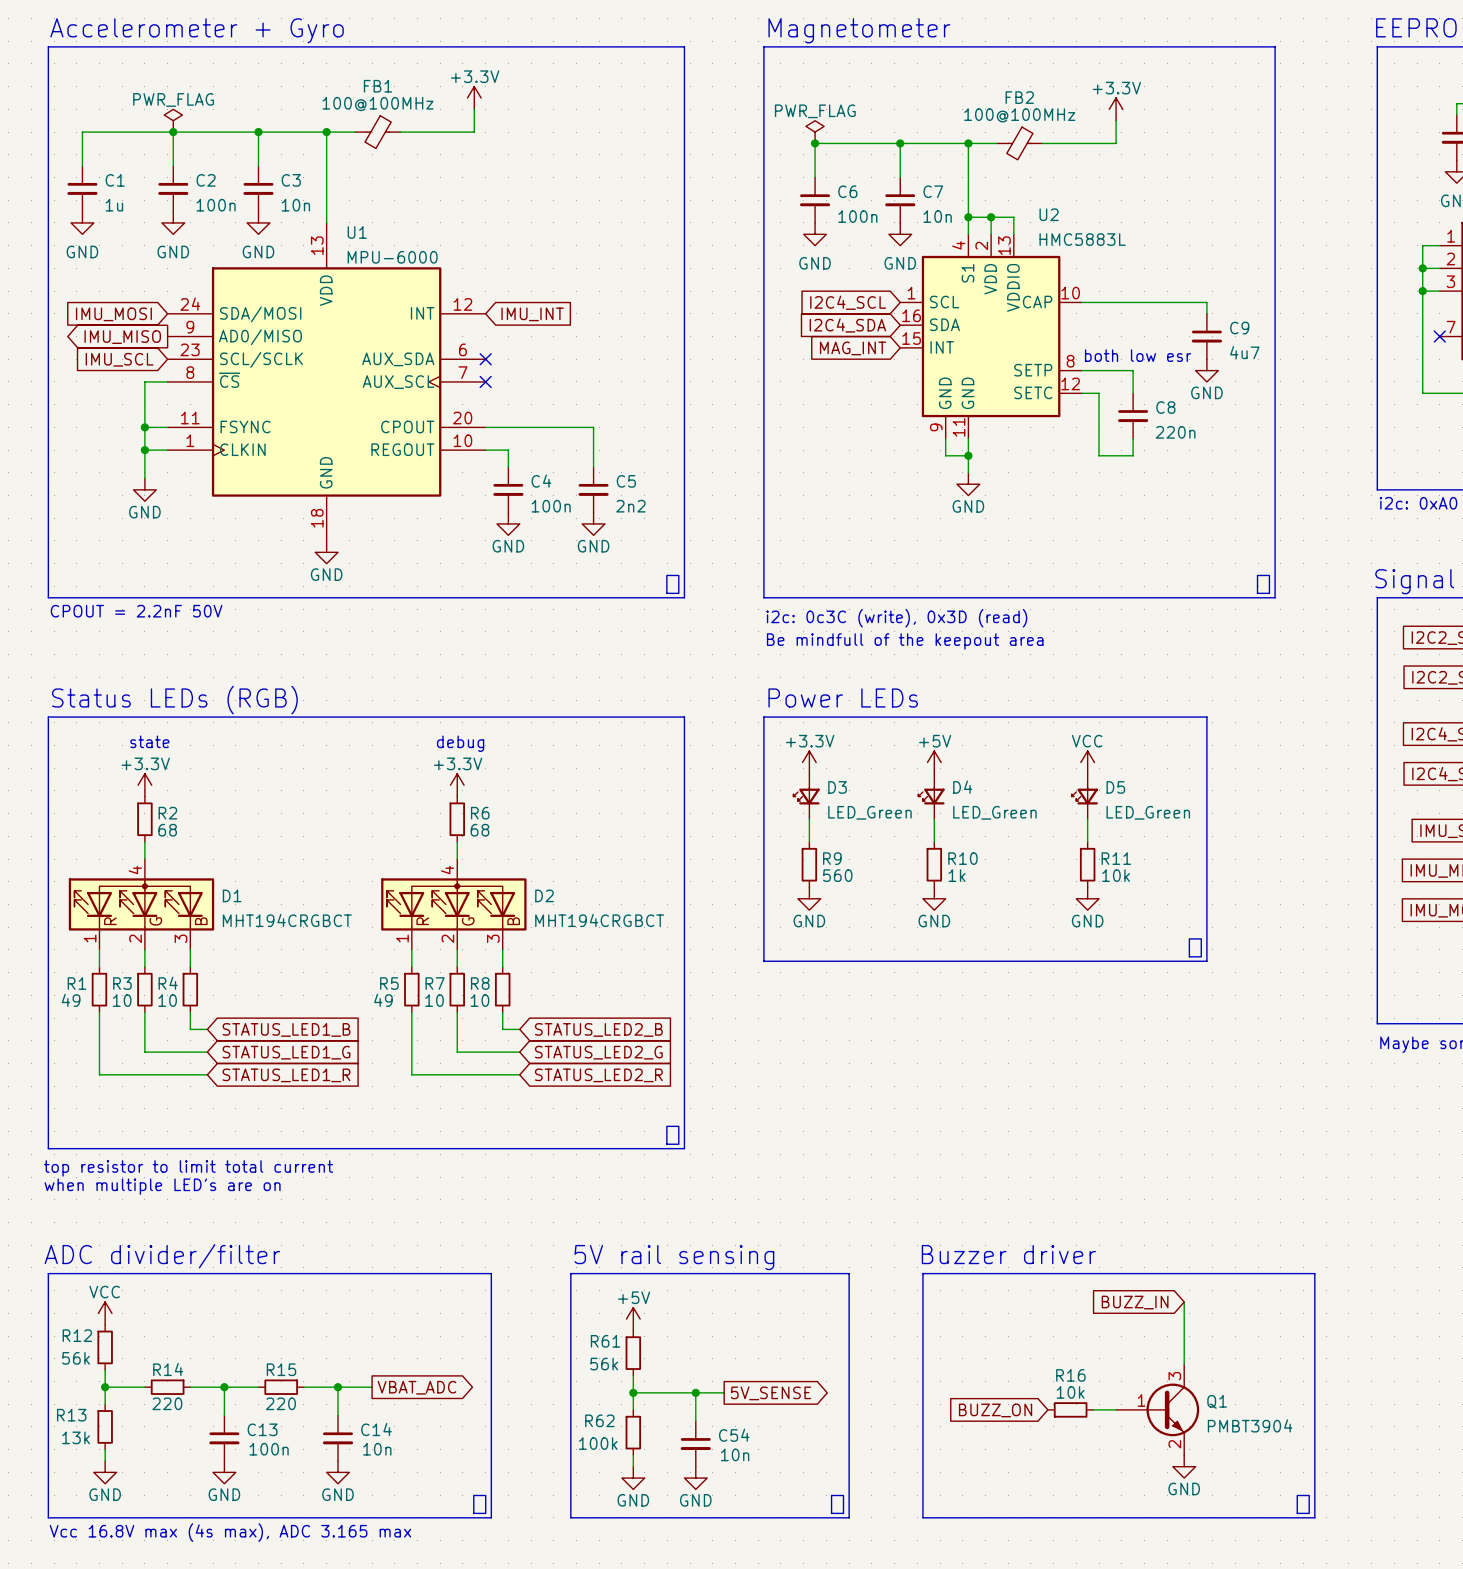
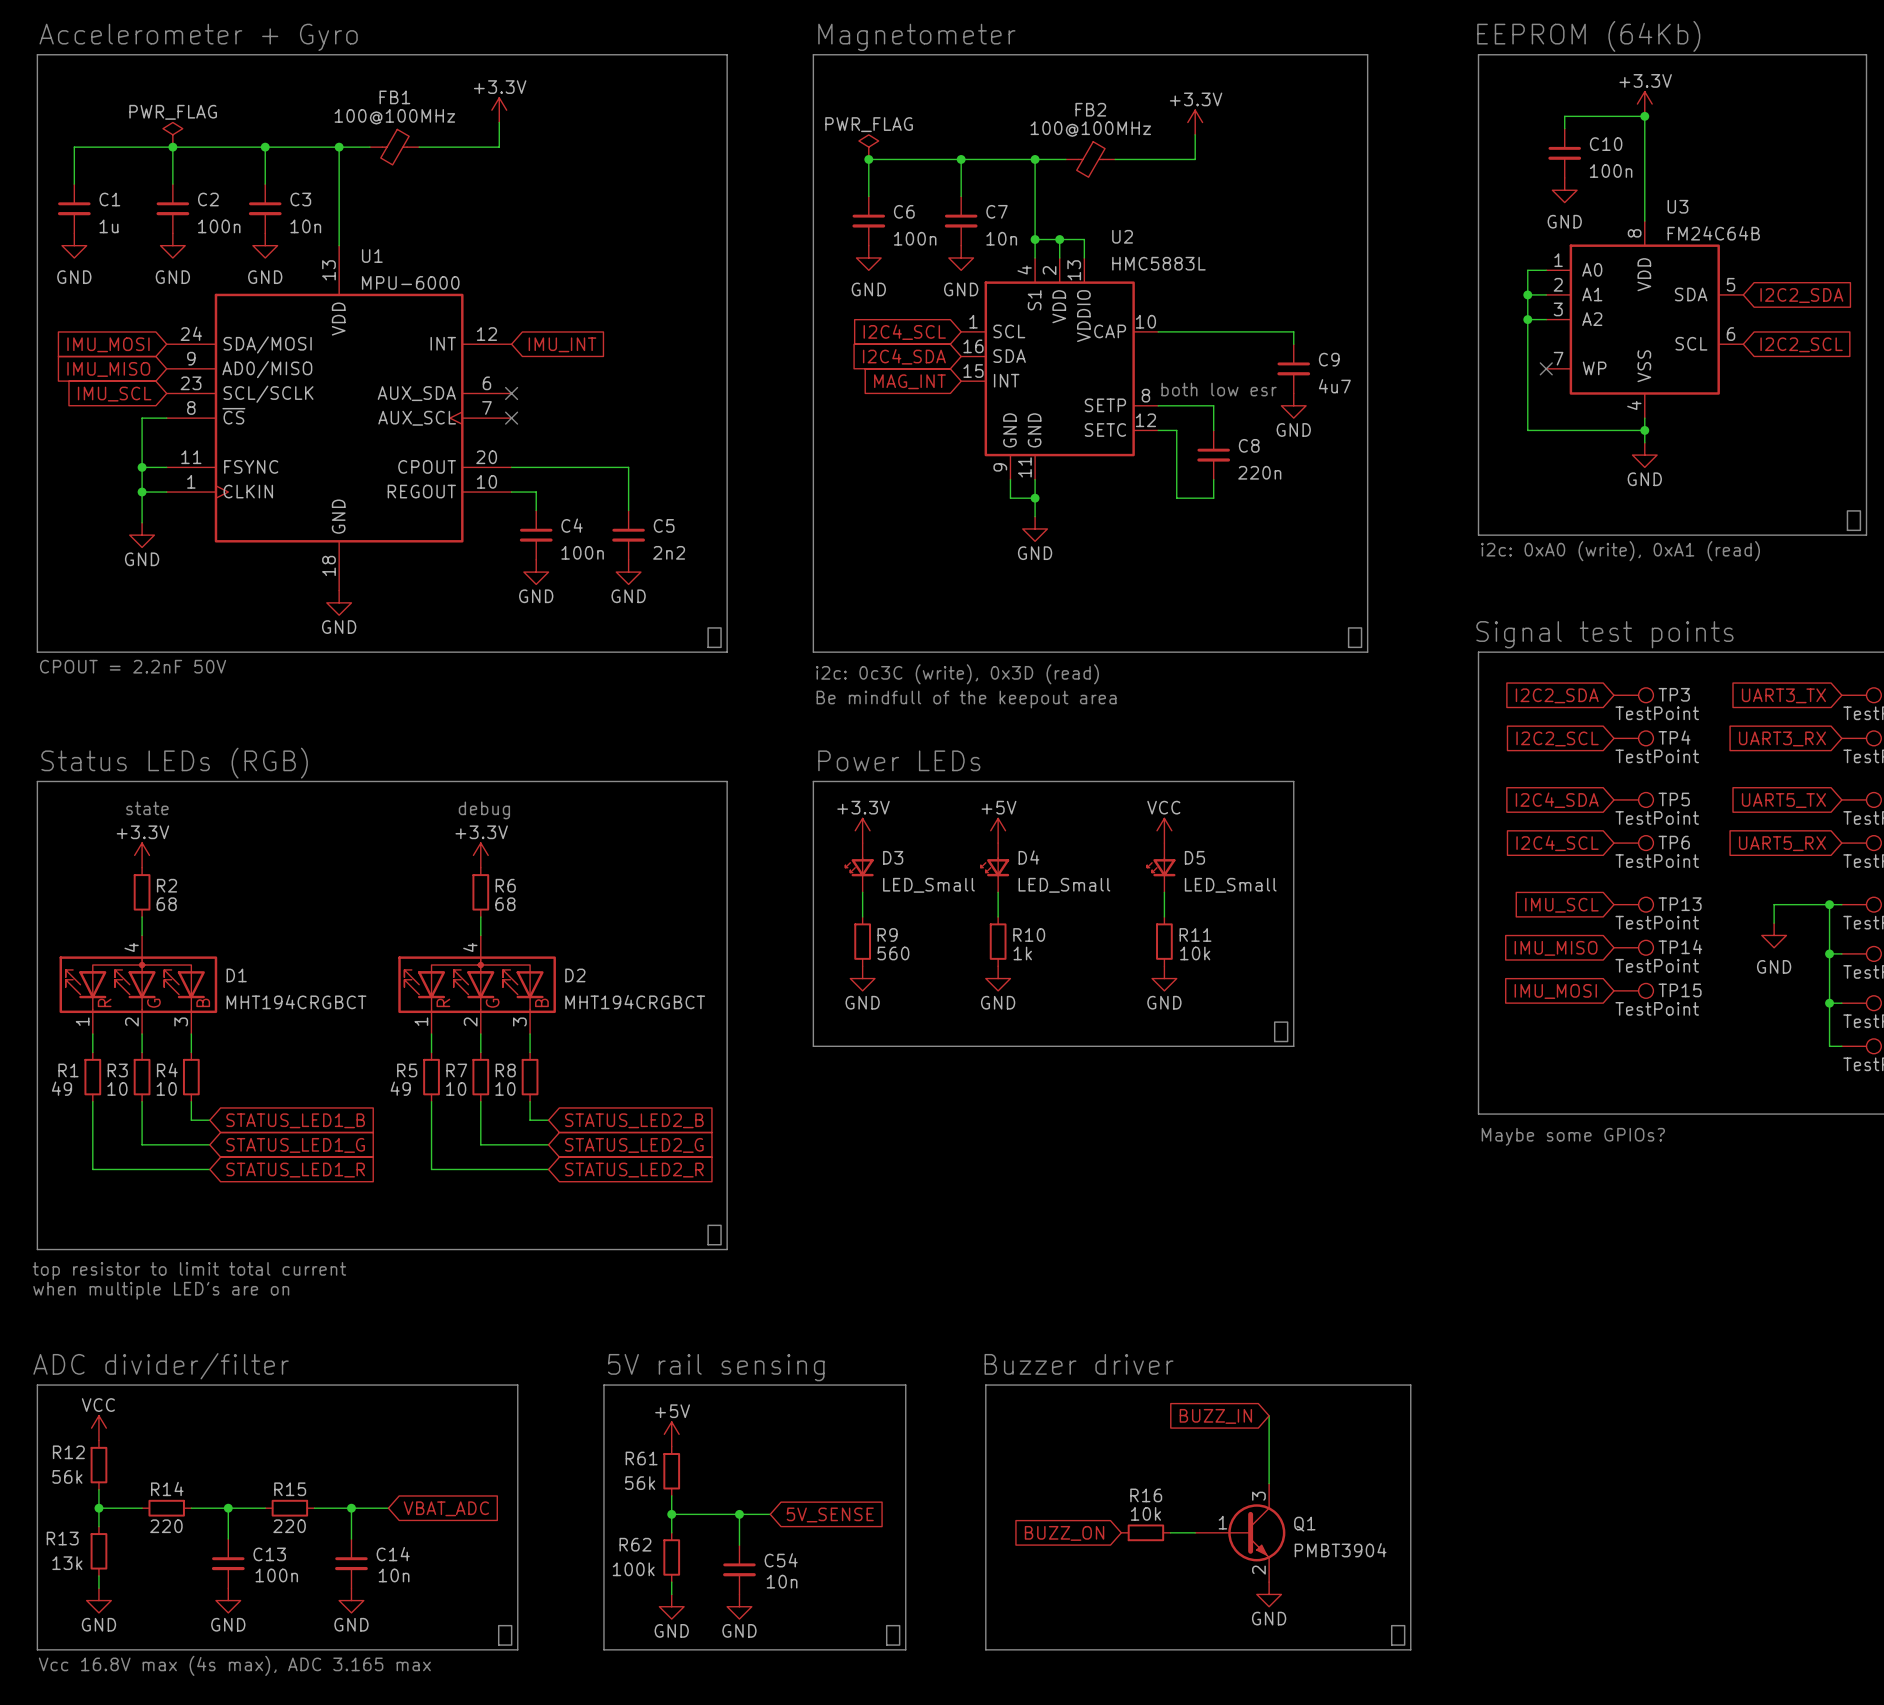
global label shape: output (122, 337) -> input (108, 369)
D3 value: LED_Green (869, 812) -> LED_Small (928, 885)
D4 value: LED_Green (994, 812) -> LED_Small (1064, 885)
D5 value: LED_Green (1148, 812) -> LED_Small (1230, 885)
global label shape: output (416, 1387) -> input (446, 1508)
global label shape: output (770, 1393) -> input (830, 1514)

